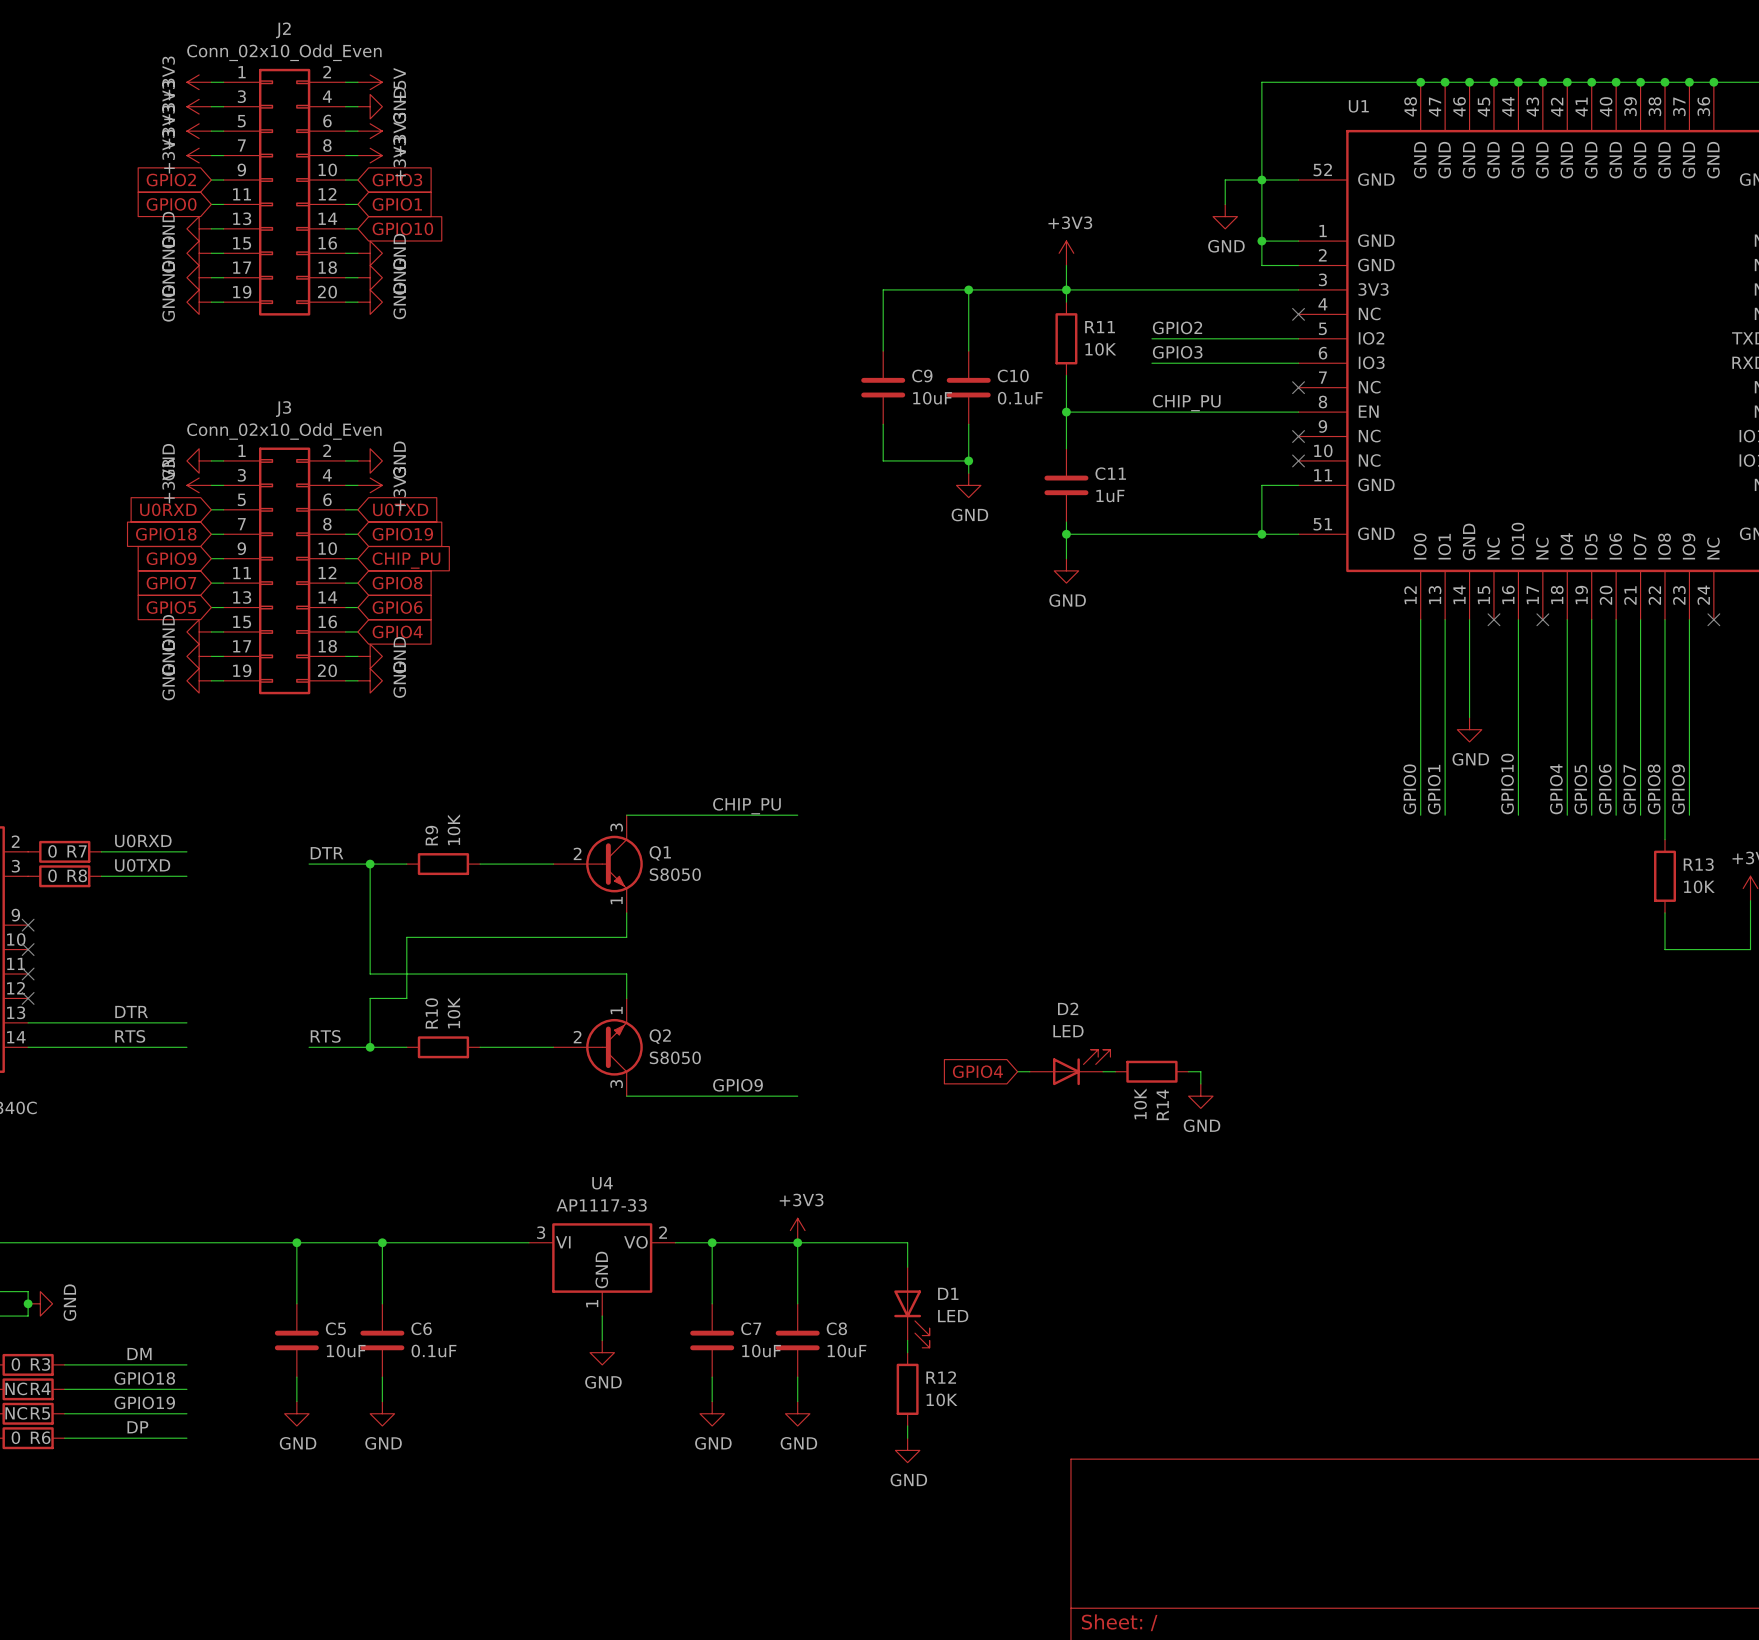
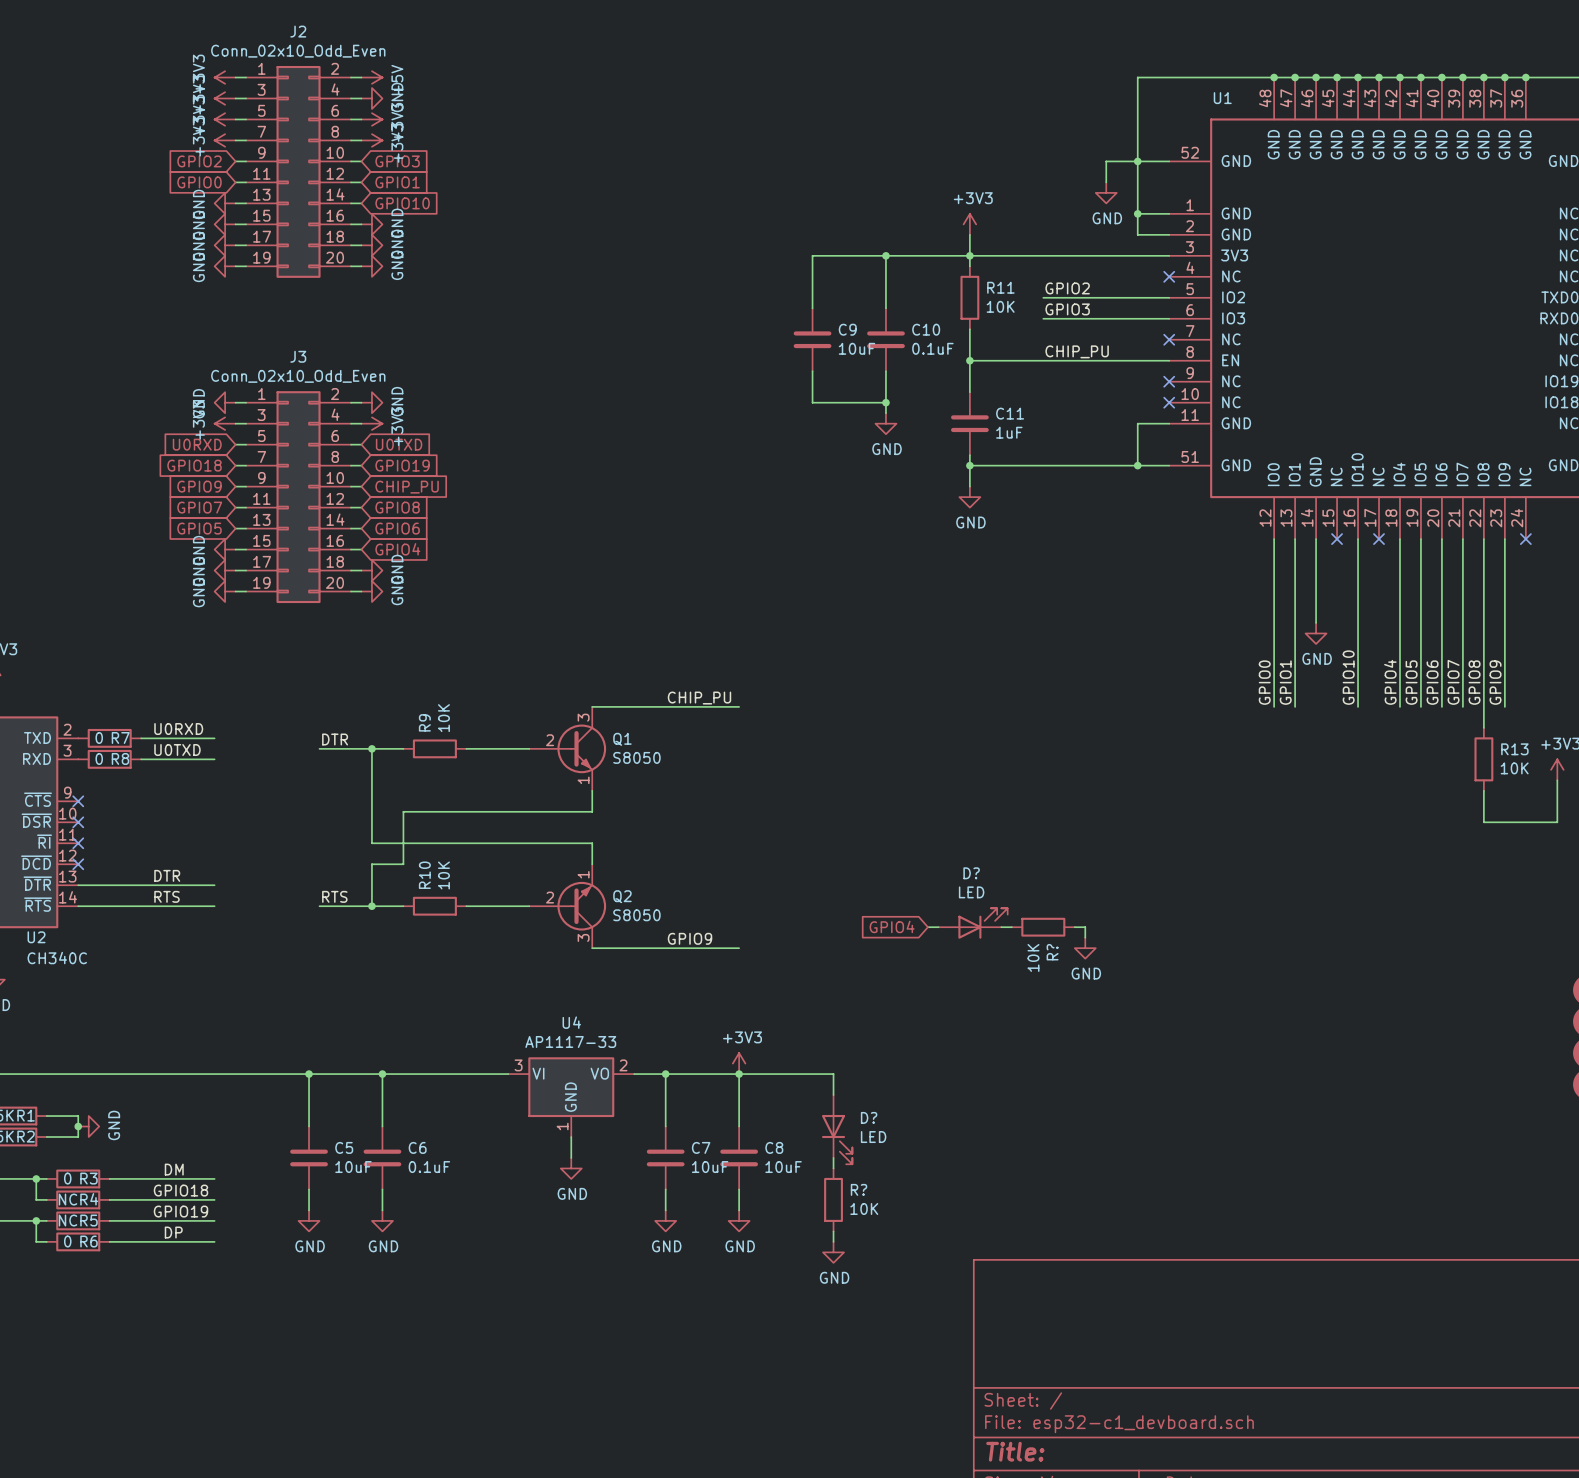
D2 name: D2 (1068, 1008) -> D? (971, 873)
R14 name: R14 (1162, 1104) -> R? (1052, 952)
D1 name: D1 (948, 1293) -> D? (869, 1117)
R12 name: R12 (941, 1377) -> R? (859, 1189)

